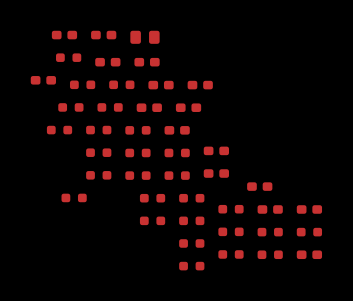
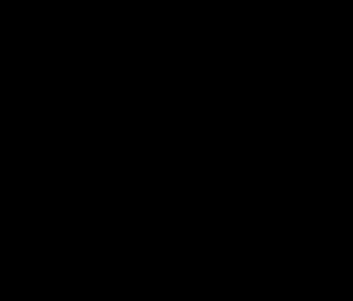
part: (64, 35) -> none
part: (103, 35) -> none
part: (144, 37) -> none
part: (68, 57) -> none
part: (107, 62) -> none
part: (147, 62) -> none
part: (43, 80) -> none
part: (82, 84) -> none
part: (121, 84) -> none
part: (161, 85) -> none
part: (200, 85) -> none
part: (70, 107) -> none
part: (110, 107) -> none
part: (149, 107) -> none
part: (188, 107) -> none
part: (59, 130) -> none
part: (98, 130) -> none
part: (137, 130) -> none
part: (177, 130) -> none
part: (216, 150) -> none
part: (98, 152) -> none
part: (137, 152) -> none
part: (177, 152) -> none
part: (216, 173) -> none
part: (98, 175) -> none
part: (137, 175) -> none
part: (177, 175) -> none
part: (259, 186) -> none
part: (74, 197) -> none
part: (152, 198) -> none
part: (191, 198) -> none
part: (230, 209) -> none
part: (270, 209) -> none
part: (309, 209) -> none
part: (152, 220) -> none
part: (191, 220) -> none
part: (230, 231) -> none
part: (270, 232) -> none
part: (309, 232) -> none
part: (191, 243) -> none
part: (230, 254) -> none
part: (270, 254) -> none
part: (309, 254) -> none
part: (191, 266) -> none

